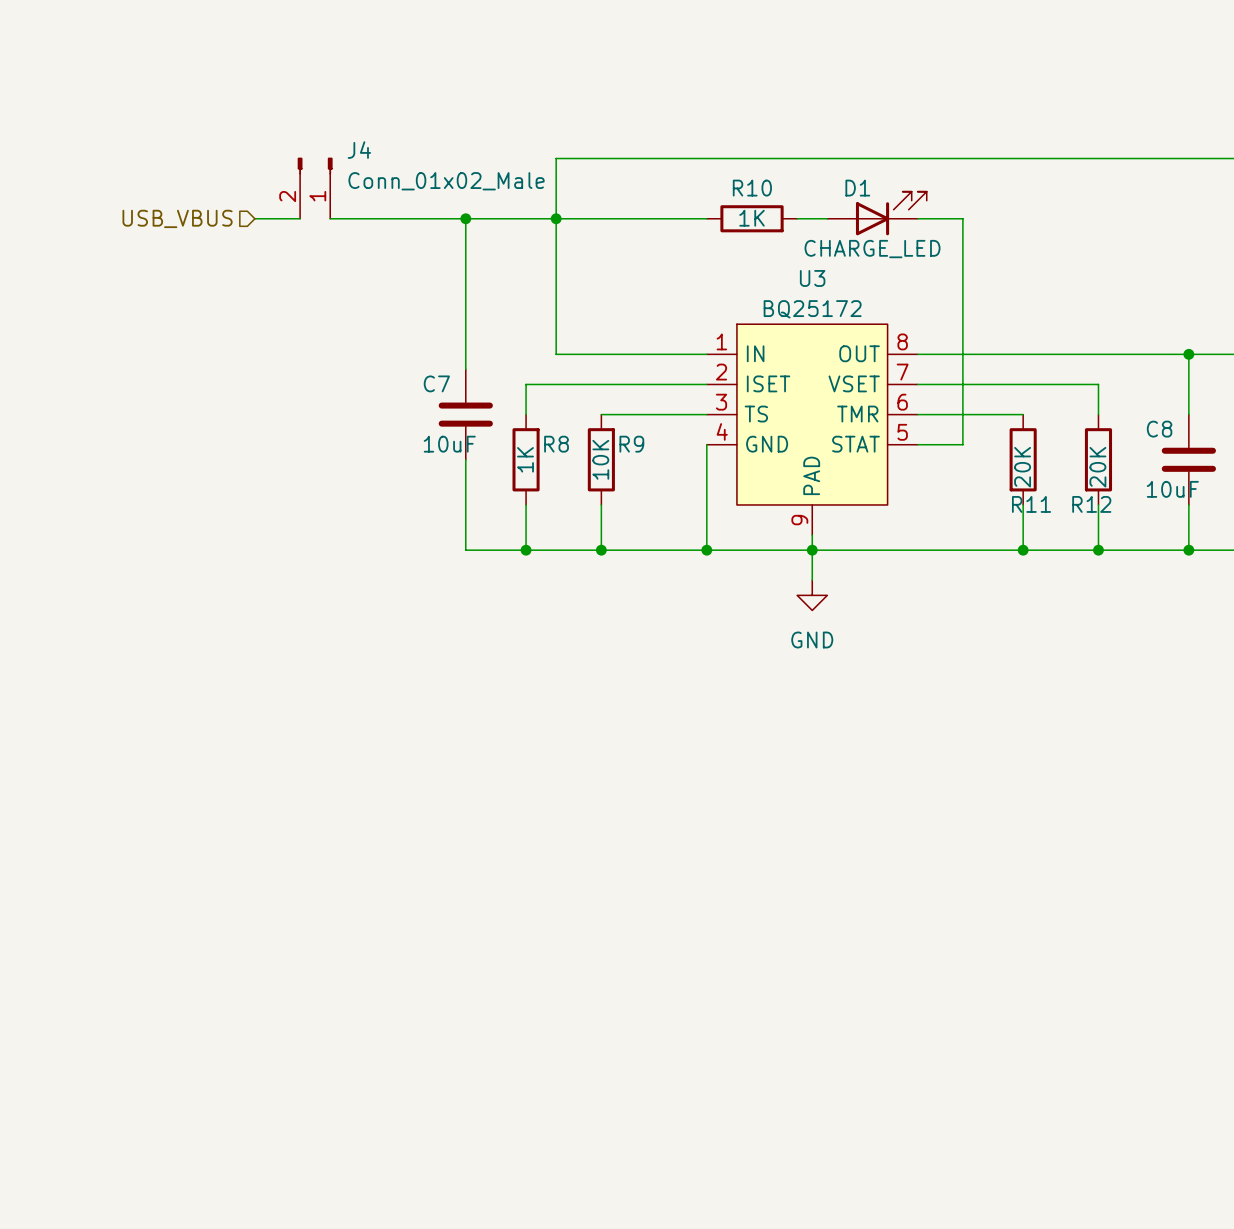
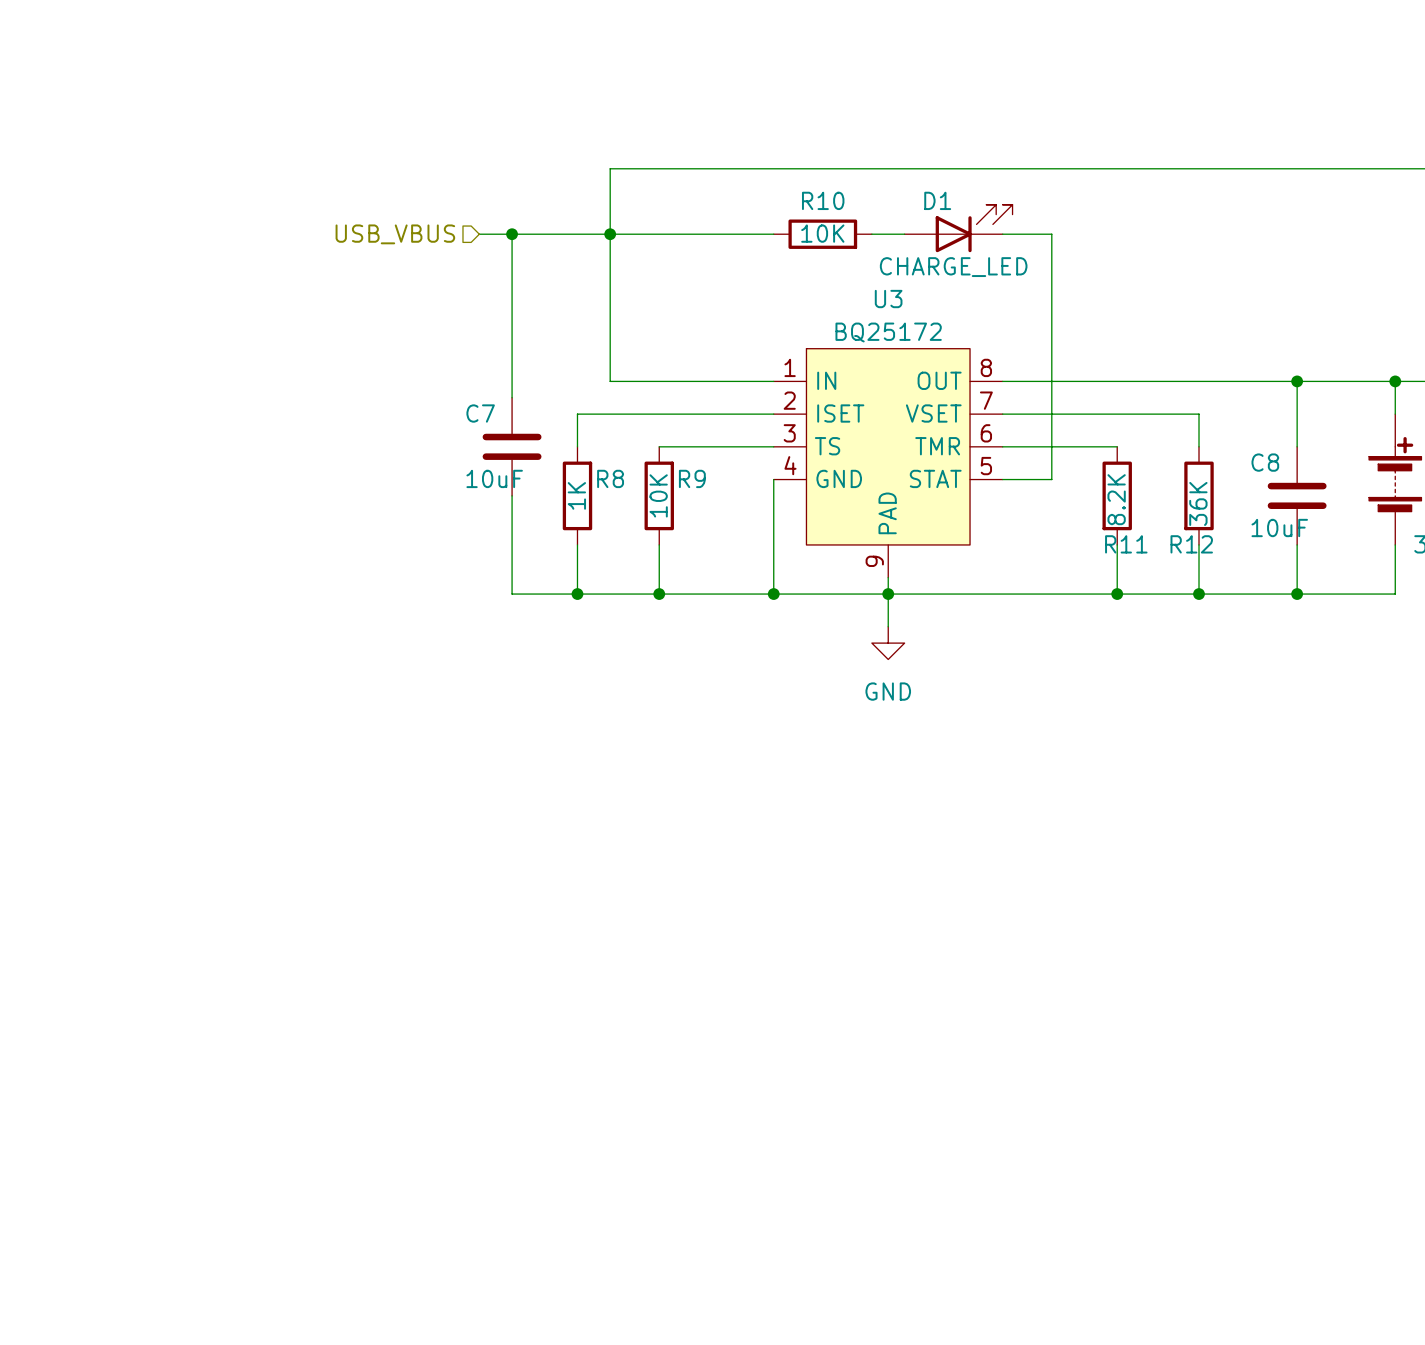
J4: Conn_01x02_Male (315, 188) -> none
hierarchical label position: USB_VBUS (177, 218) -> USB_VBUS (395, 234)
wire: (254, 218) (300, 218) -> none
wire: (330, 218) (435, 218) -> none
R10 value: 1K (752, 218) -> 10K (822, 233)
R11 value: 20K (1022, 467) -> 8.2K (1116, 499)
R12 value: 20K (1097, 467) -> 36K (1198, 503)

